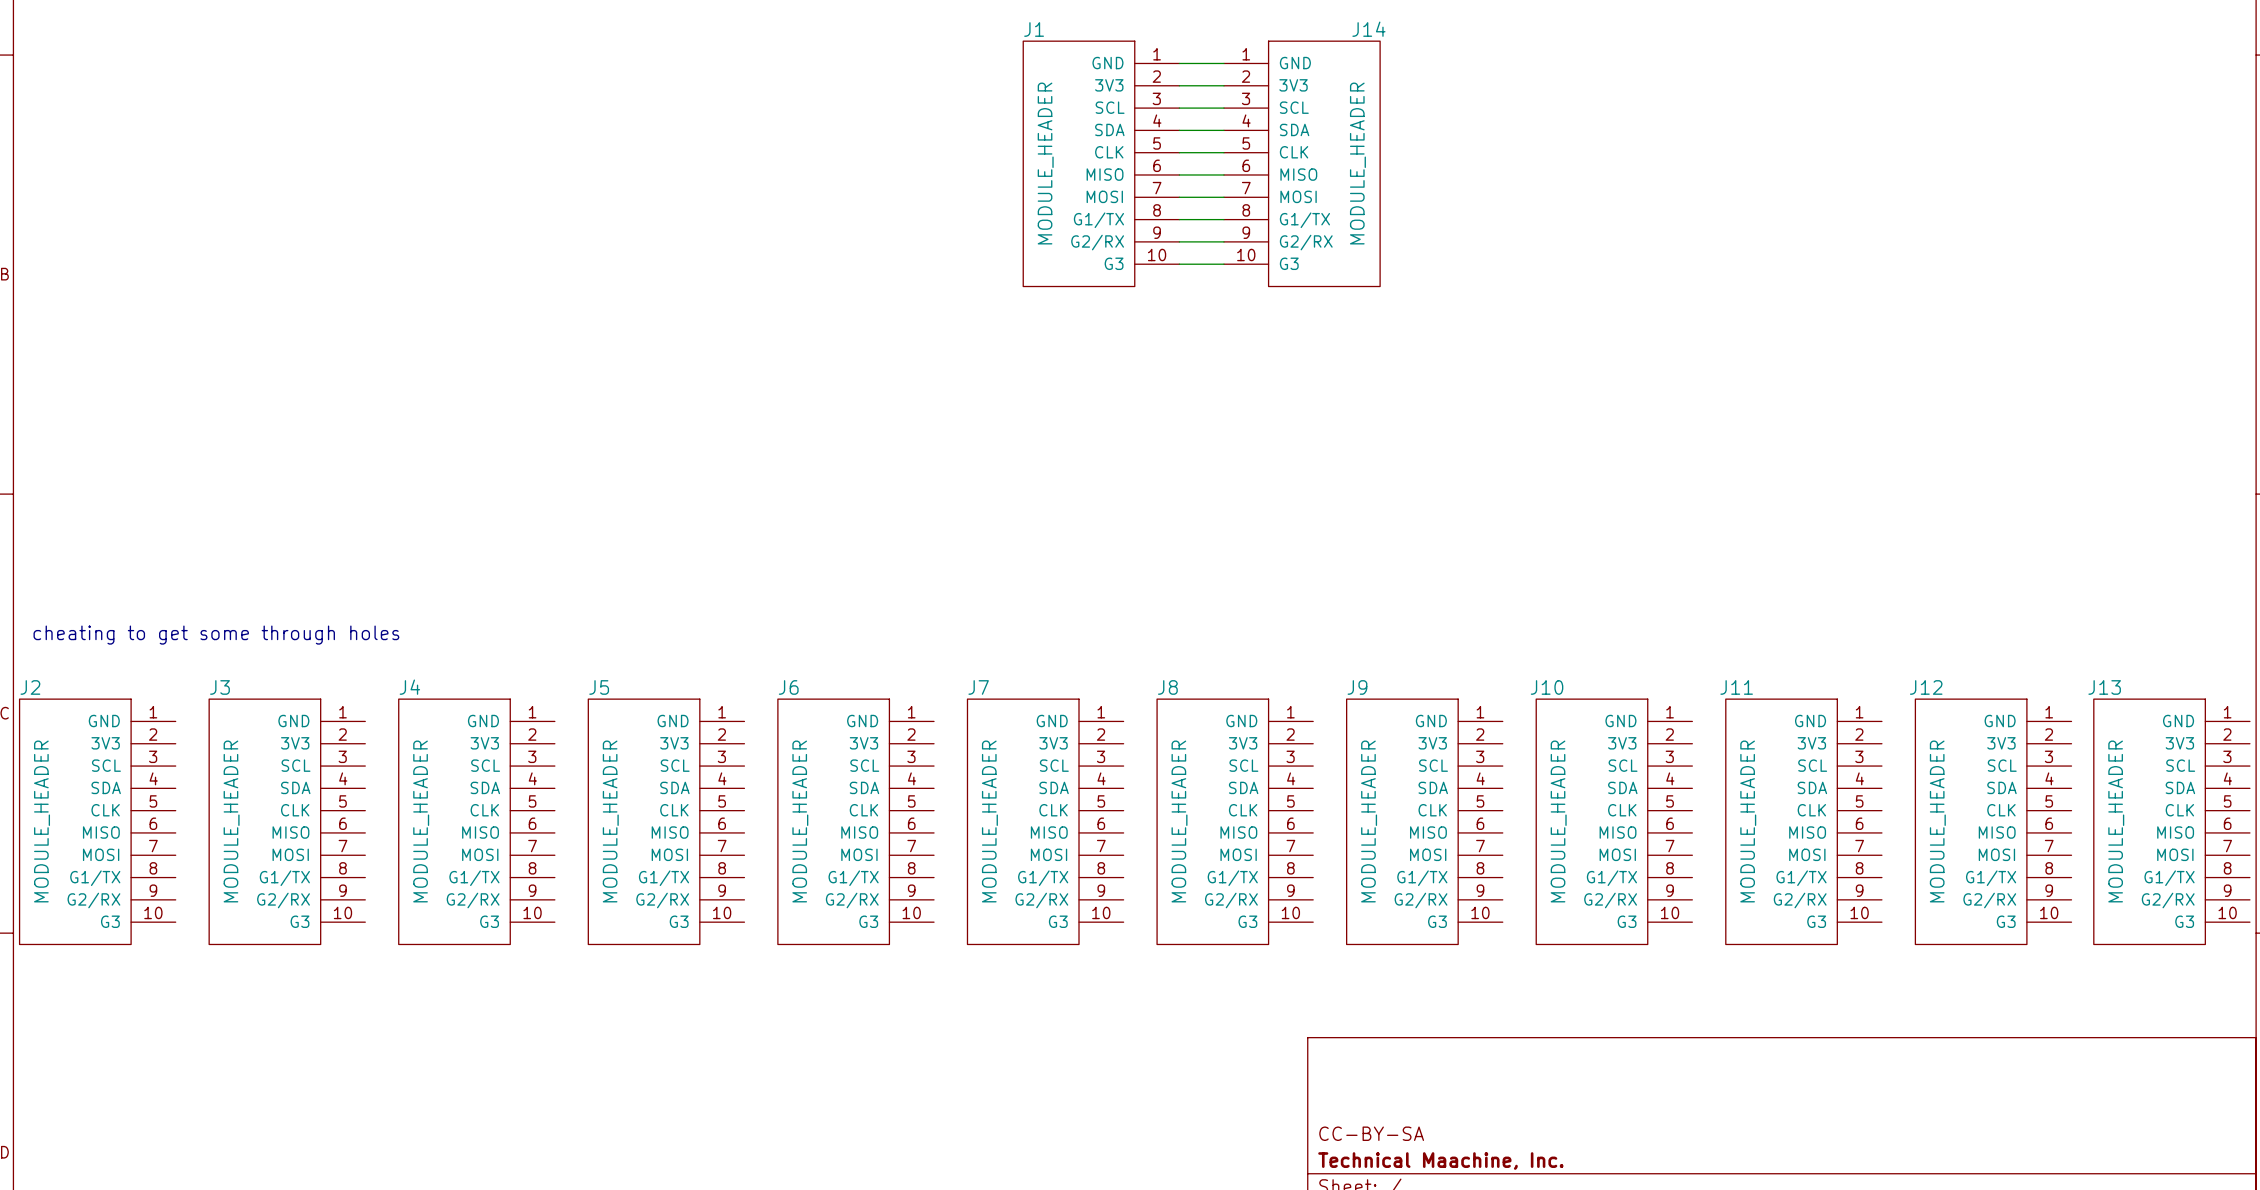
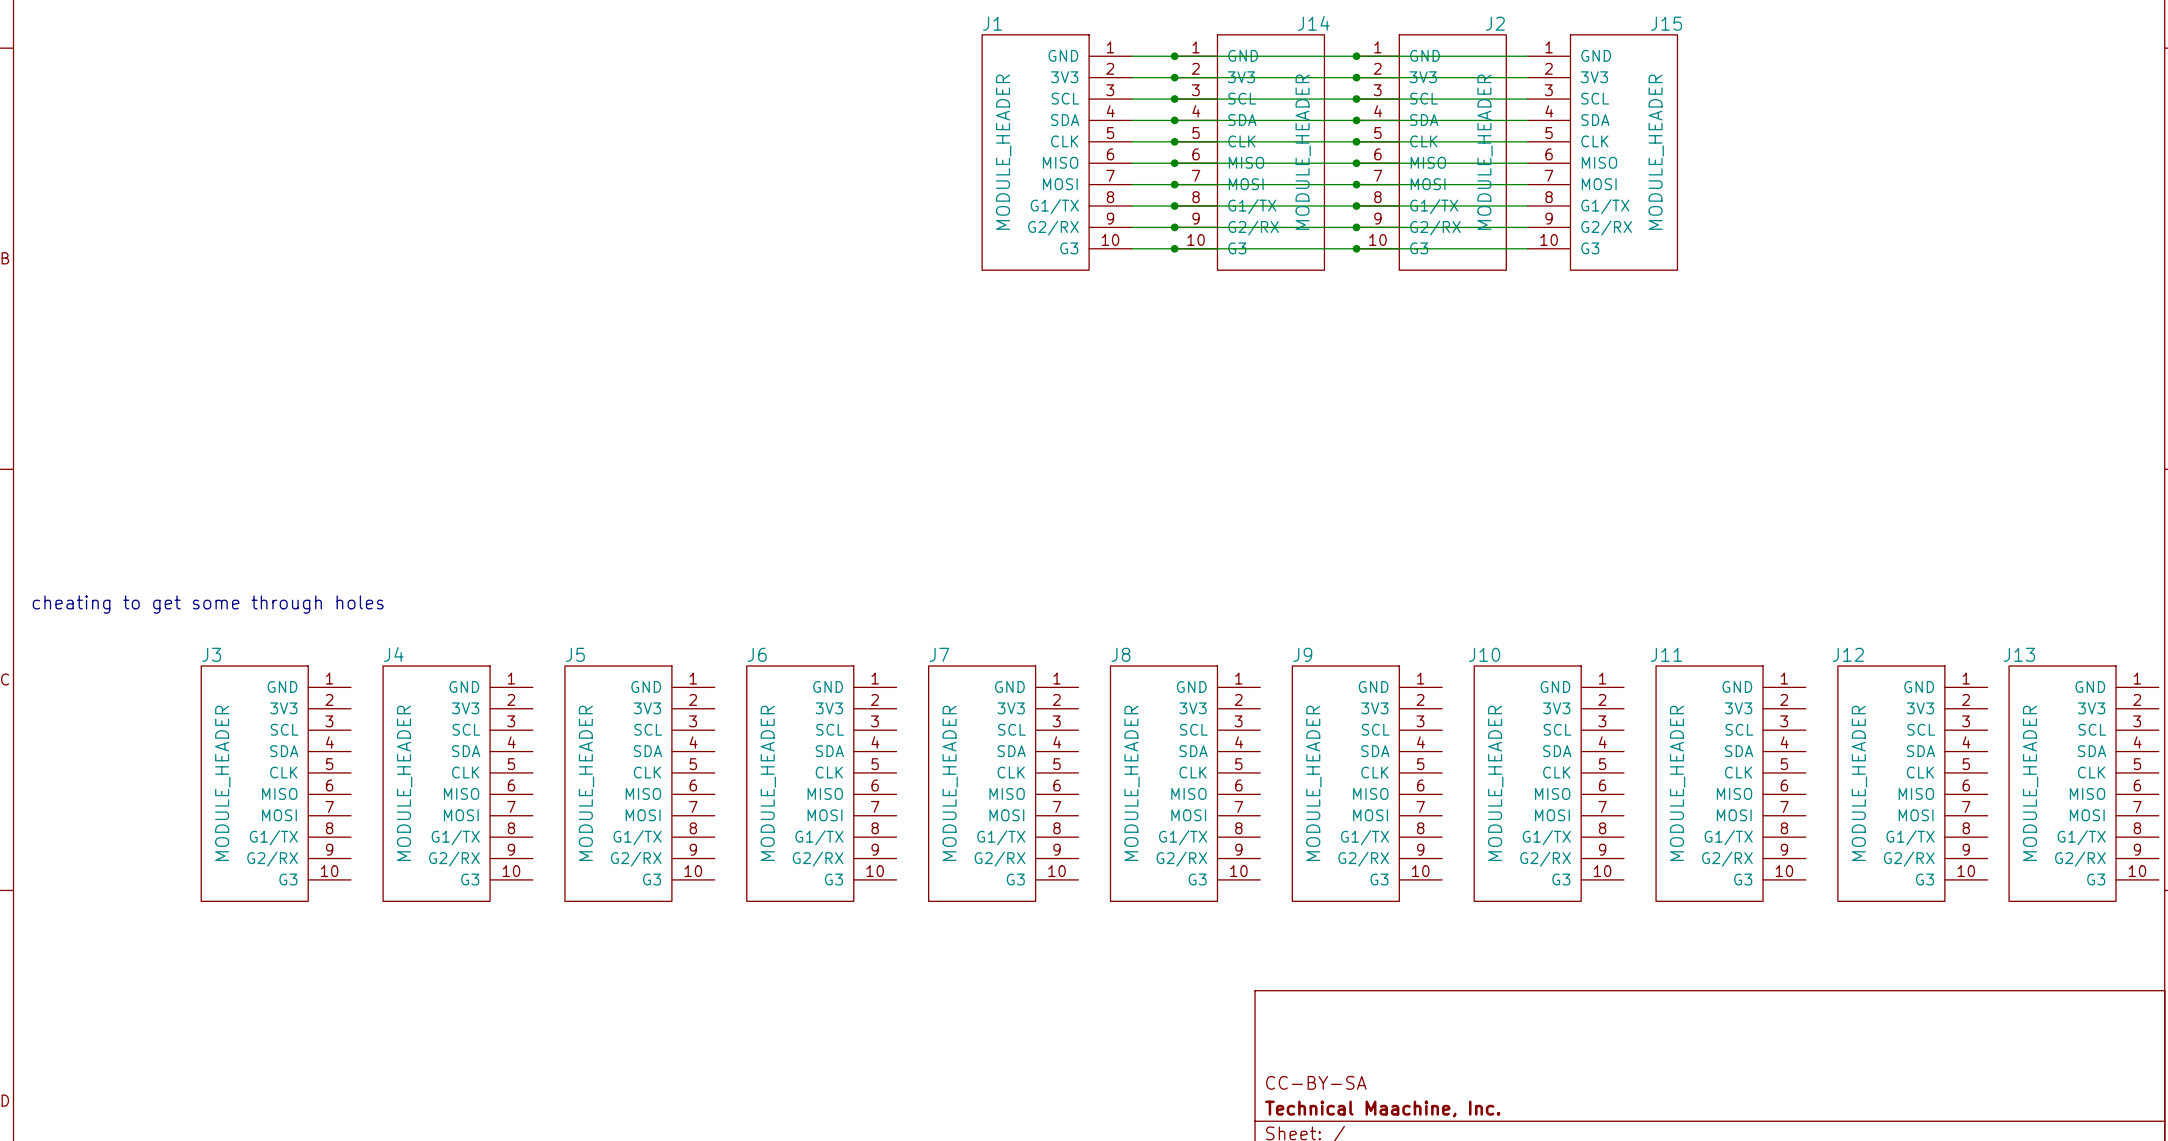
wire: none -> (1174, 56) (1527, 56)
junction: none -> (1174, 56)
junction: none -> (1356, 56)
wire: none -> (1174, 77) (1527, 77)
junction: none -> (1174, 77)
junction: none -> (1356, 77)
wire: none -> (1174, 99) (1527, 99)
junction: none -> (1174, 99)
junction: none -> (1356, 99)
wire: none -> (1174, 120) (1527, 120)
junction: none -> (1174, 120)
junction: none -> (1356, 120)
wire: none -> (1174, 141) (1527, 141)
junction: none -> (1174, 141)
junction: none -> (1356, 141)
J15: none -> MODULE_HEADER (1602, 152)
wire: none -> (1174, 163) (1527, 163)
junction: none -> (1174, 163)
junction: none -> (1356, 163)
wire: none -> (1174, 184) (1527, 184)
junction: none -> (1174, 184)
junction: none -> (1356, 184)
wire: none -> (1174, 206) (1527, 206)
junction: none -> (1174, 206)
junction: none -> (1356, 206)
wire: none -> (1174, 227) (1527, 227)
junction: none -> (1174, 227)
junction: none -> (1356, 227)
wire: none -> (1174, 248) (1527, 248)
junction: none -> (1174, 248)
junction: none -> (1356, 248)
J2 flip: as is (75, 821) -> left-right (1452, 152)
J2 position: (97, 821) -> (1431, 152)

